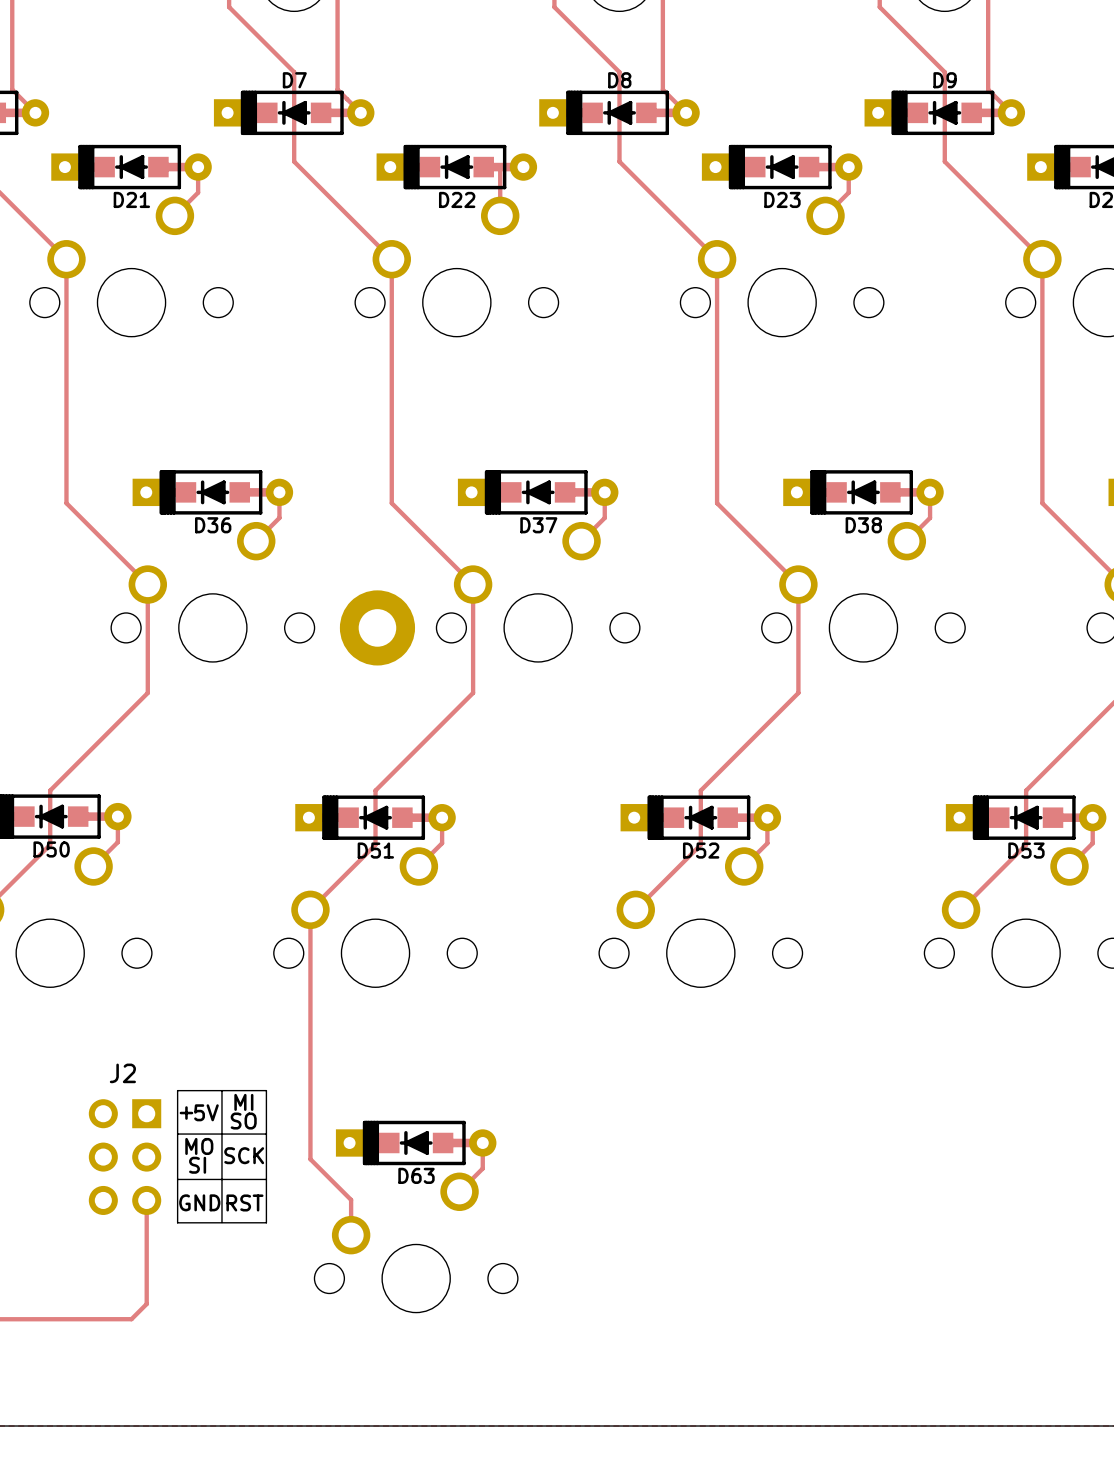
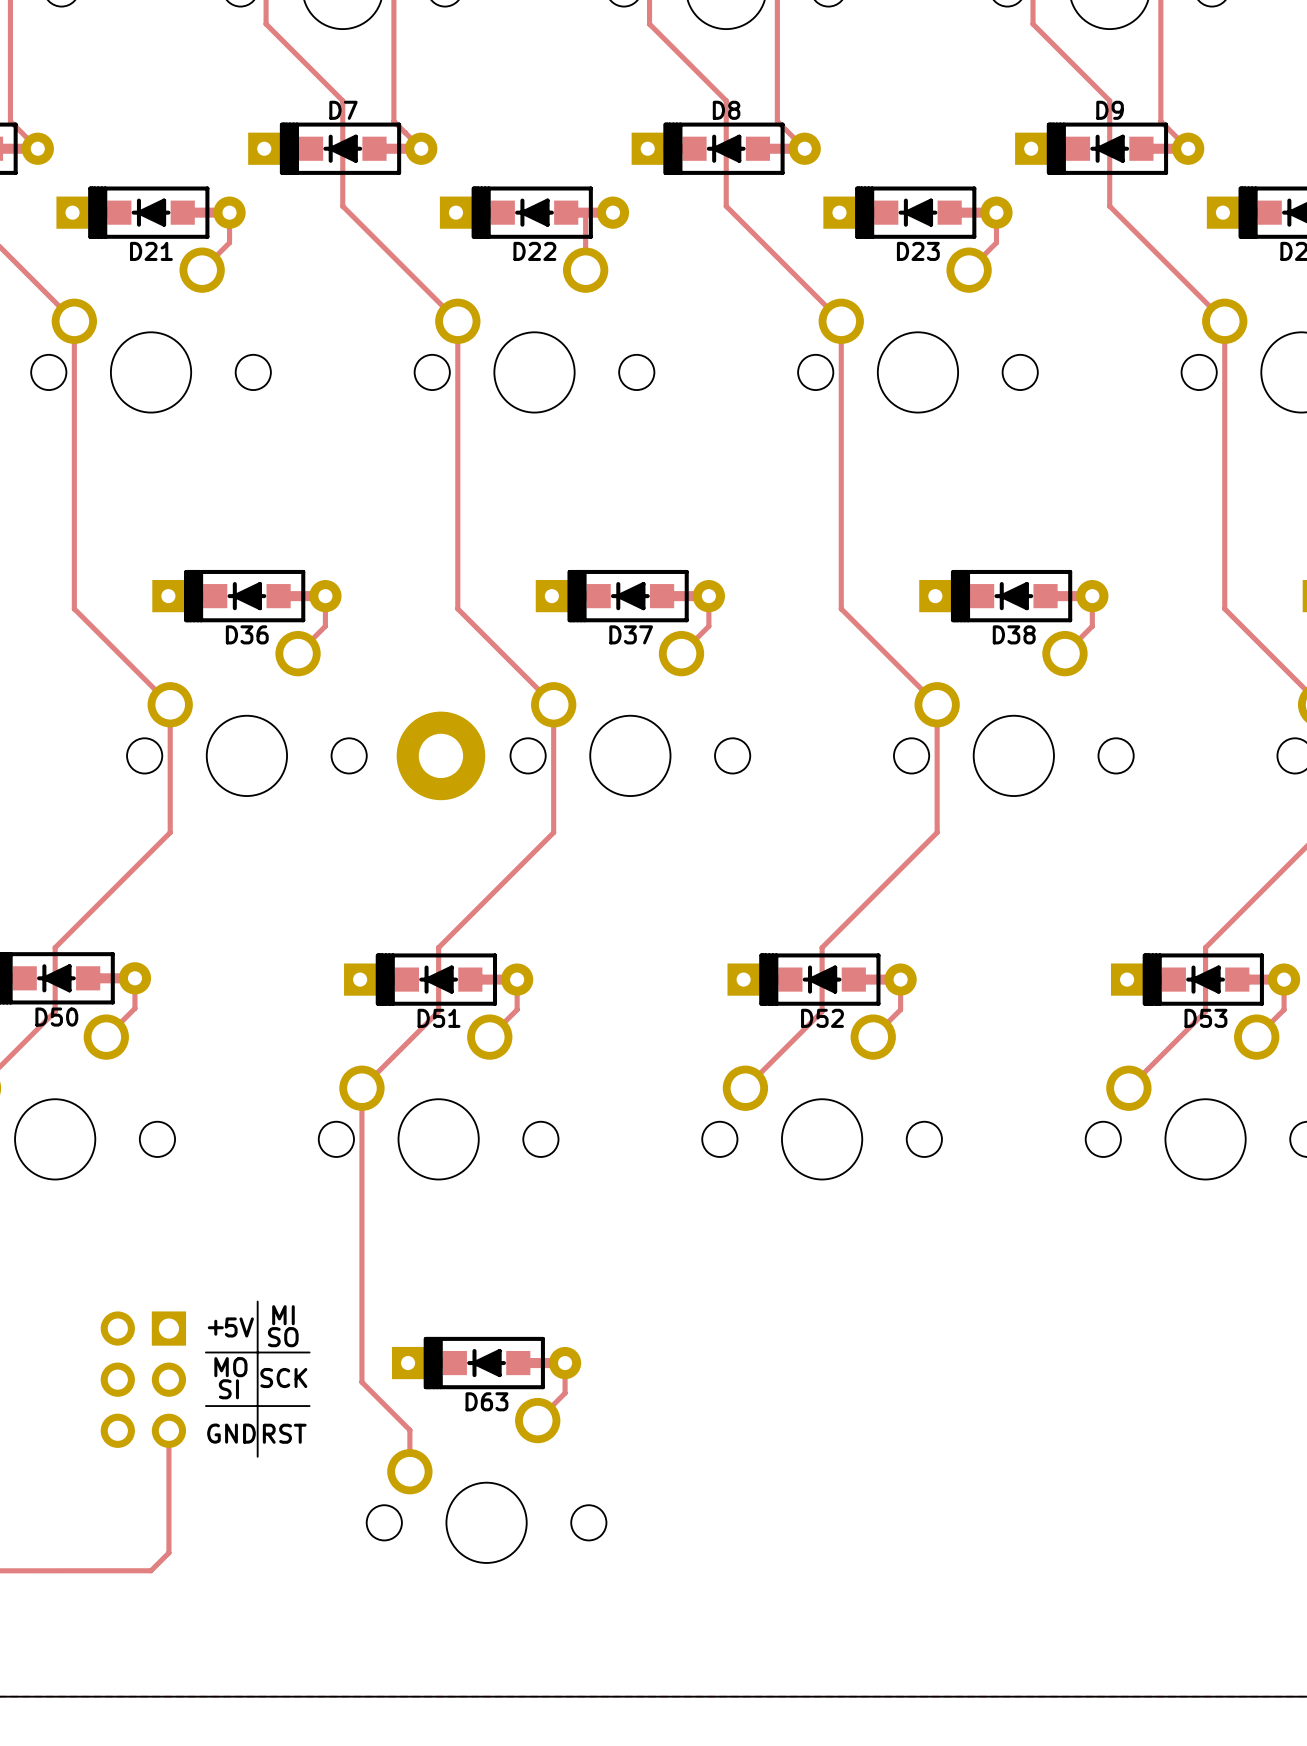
J2: (177, 1156) -> none
part: none -> (205, 1379)

